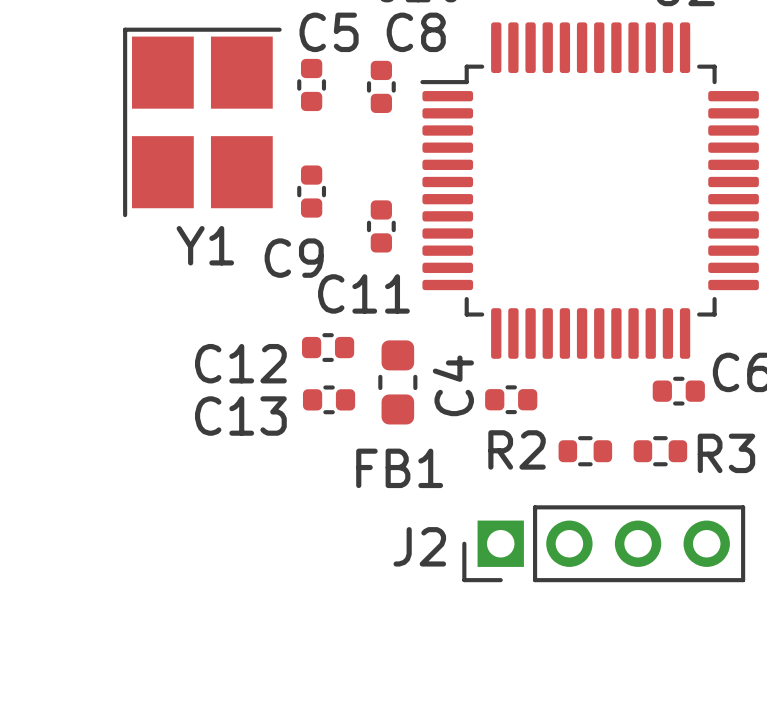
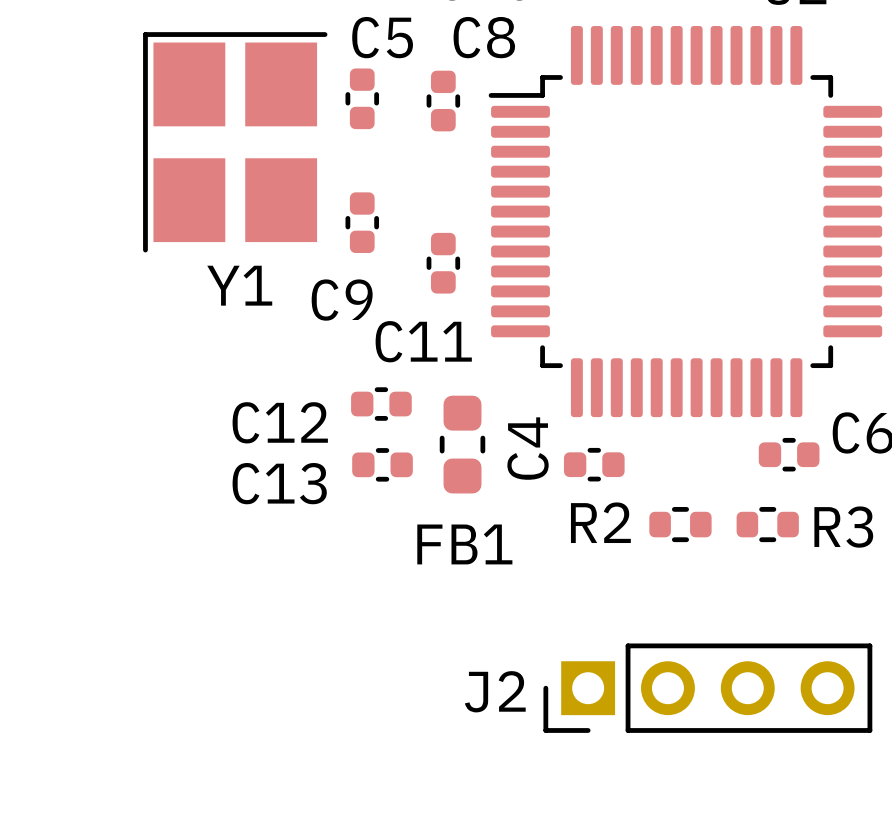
J2 position: (603, 543) -> (707, 688)

